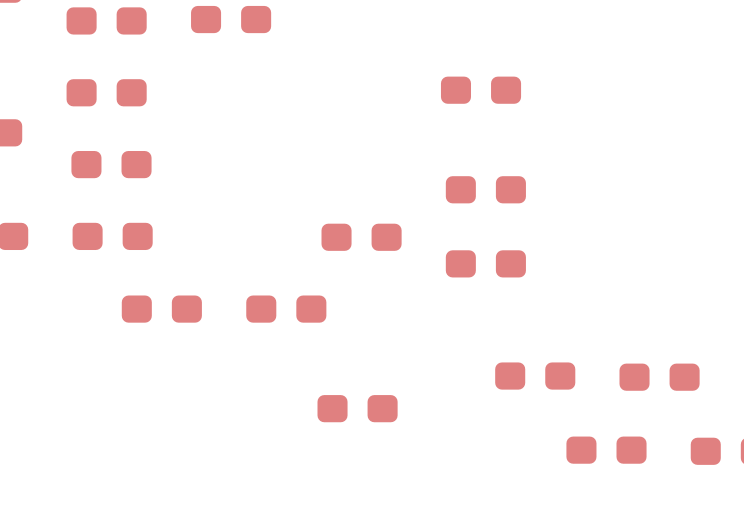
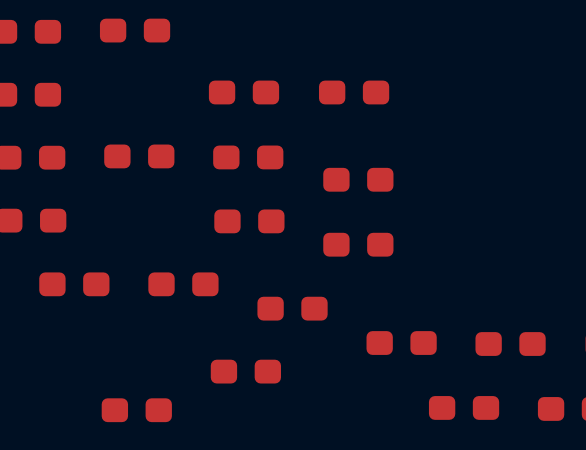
part: none -> (244, 92)
part: none -> (139, 156)
part: none -> (248, 157)
part: none -> (292, 308)
part: none -> (136, 410)

